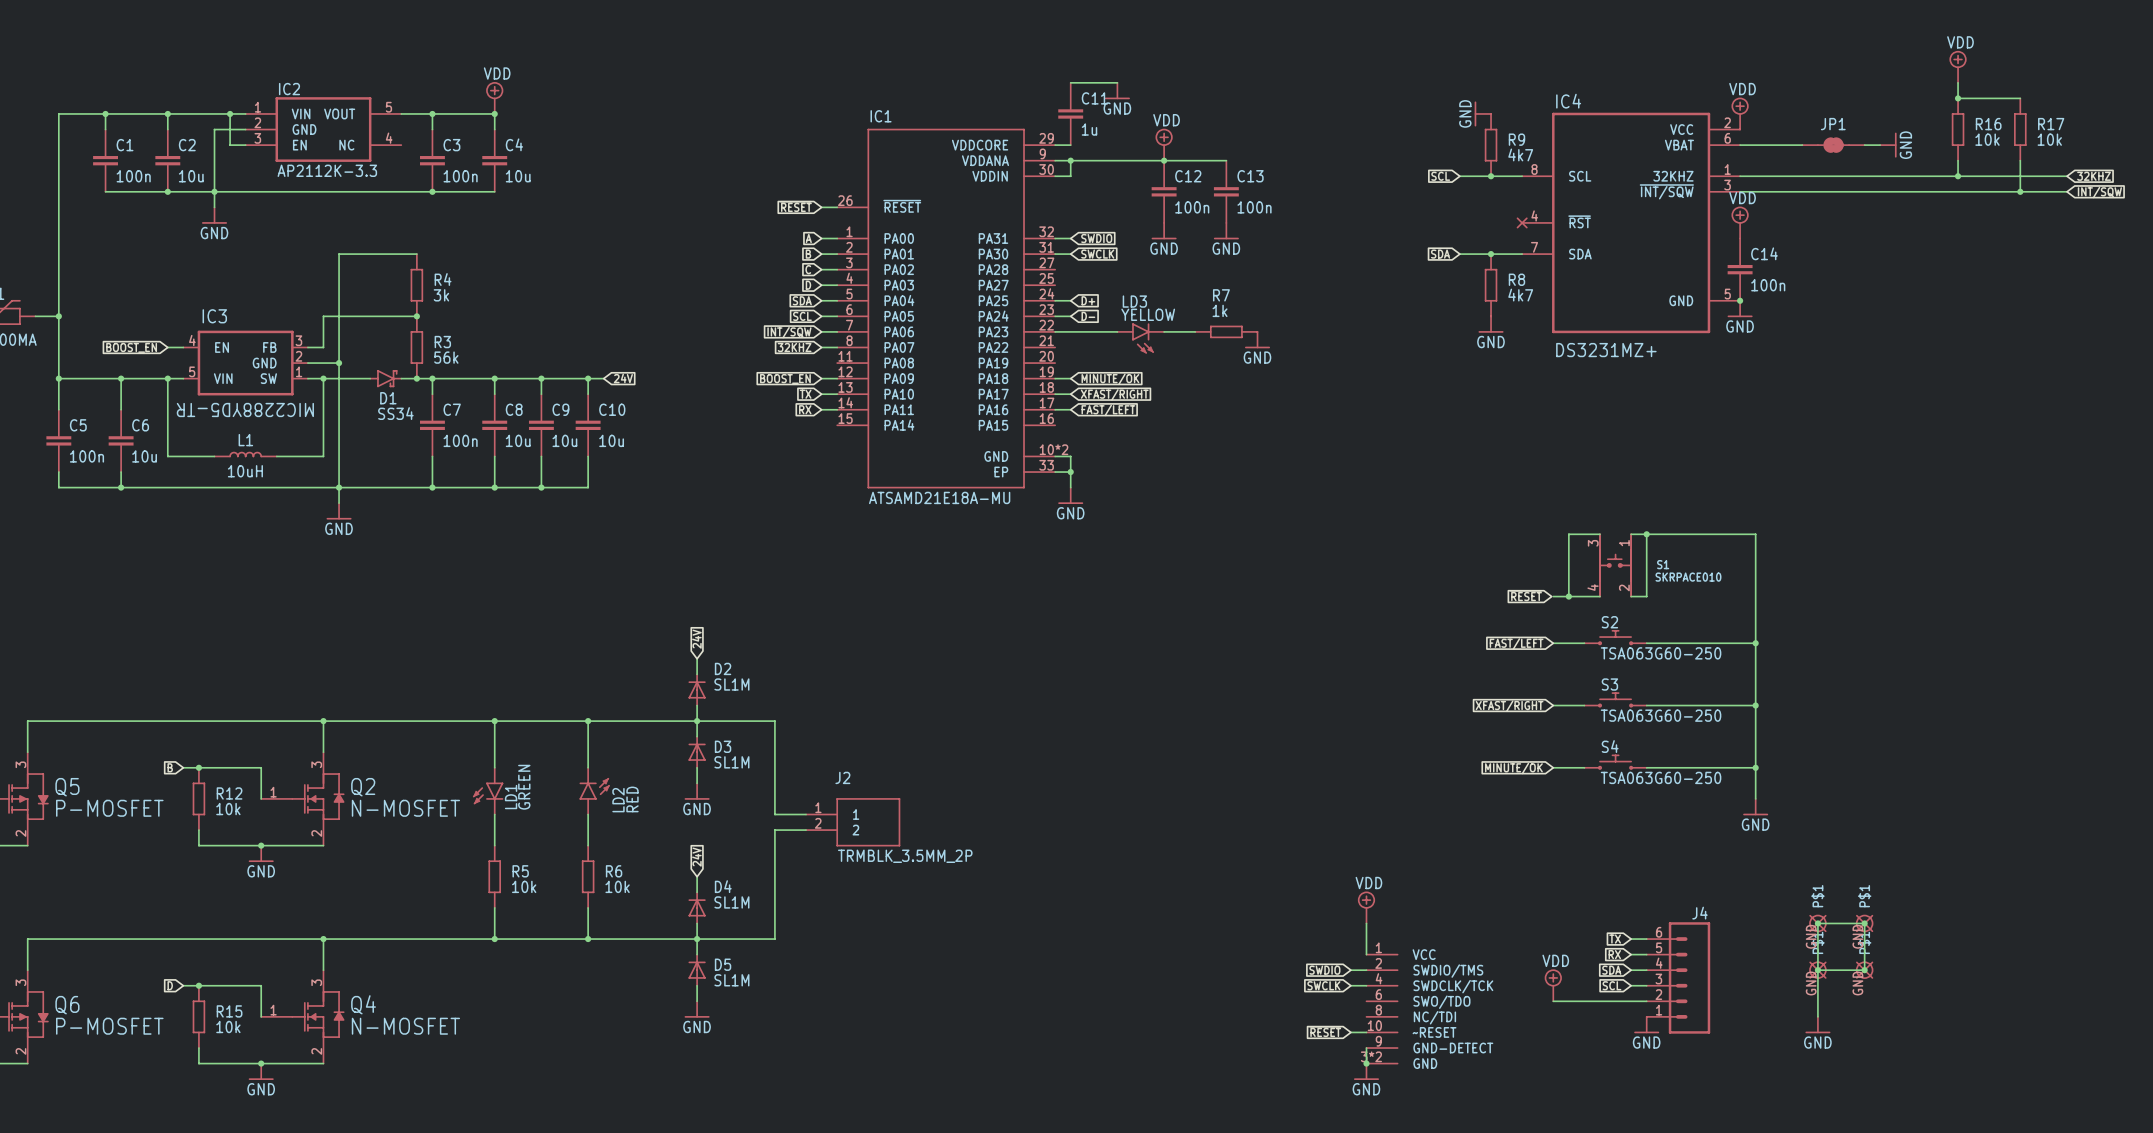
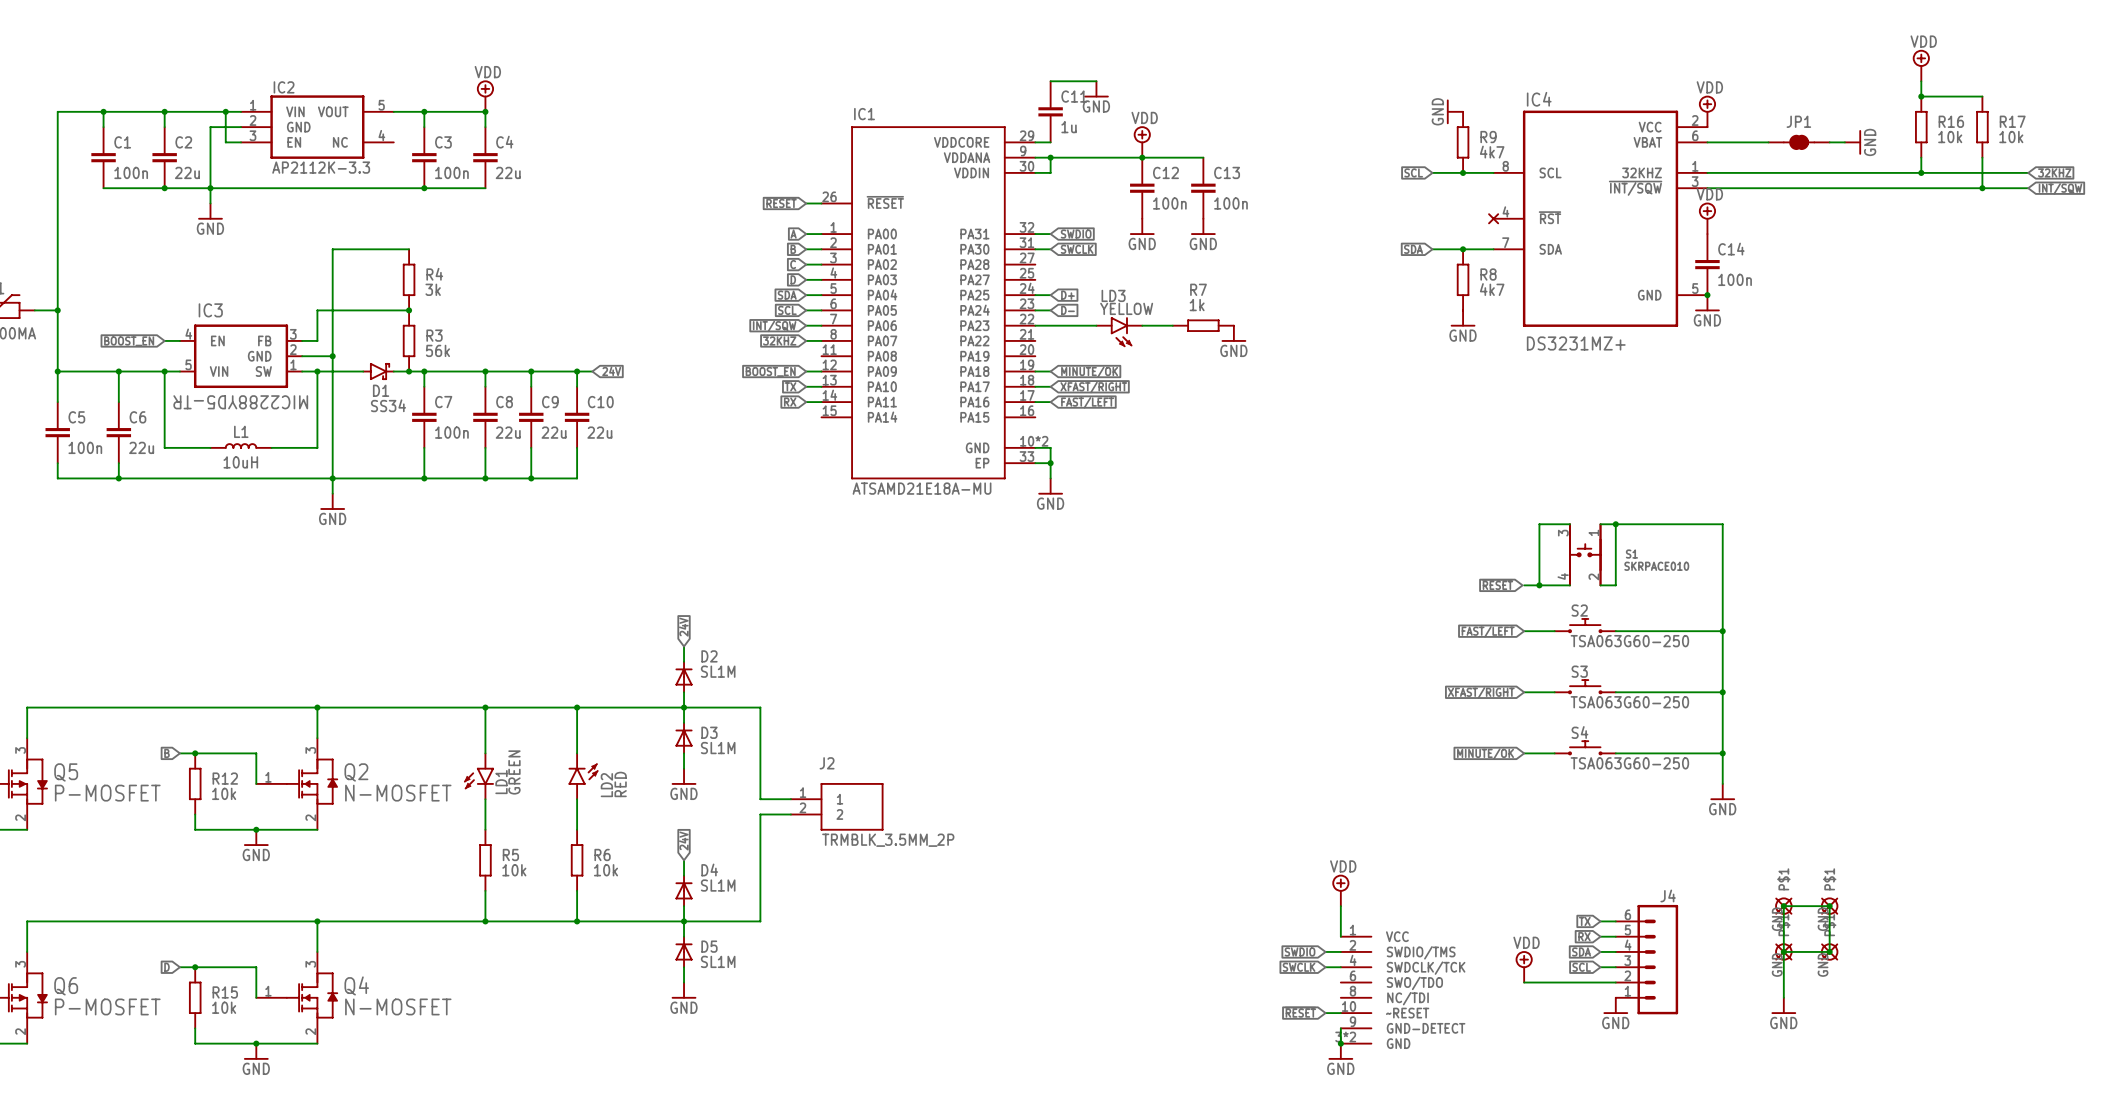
C2 value: 10u (191, 176) -> 22u (187, 172)
C4 value: 10u (518, 176) -> 22u (508, 172)
C8 value: 10u (518, 440) -> 22u (508, 432)
C9 value: 10u (564, 440) -> 22u (554, 432)
C10 value: 10u (611, 440) -> 22u (599, 432)
C6 value: 10u (144, 456) -> 22u (141, 447)

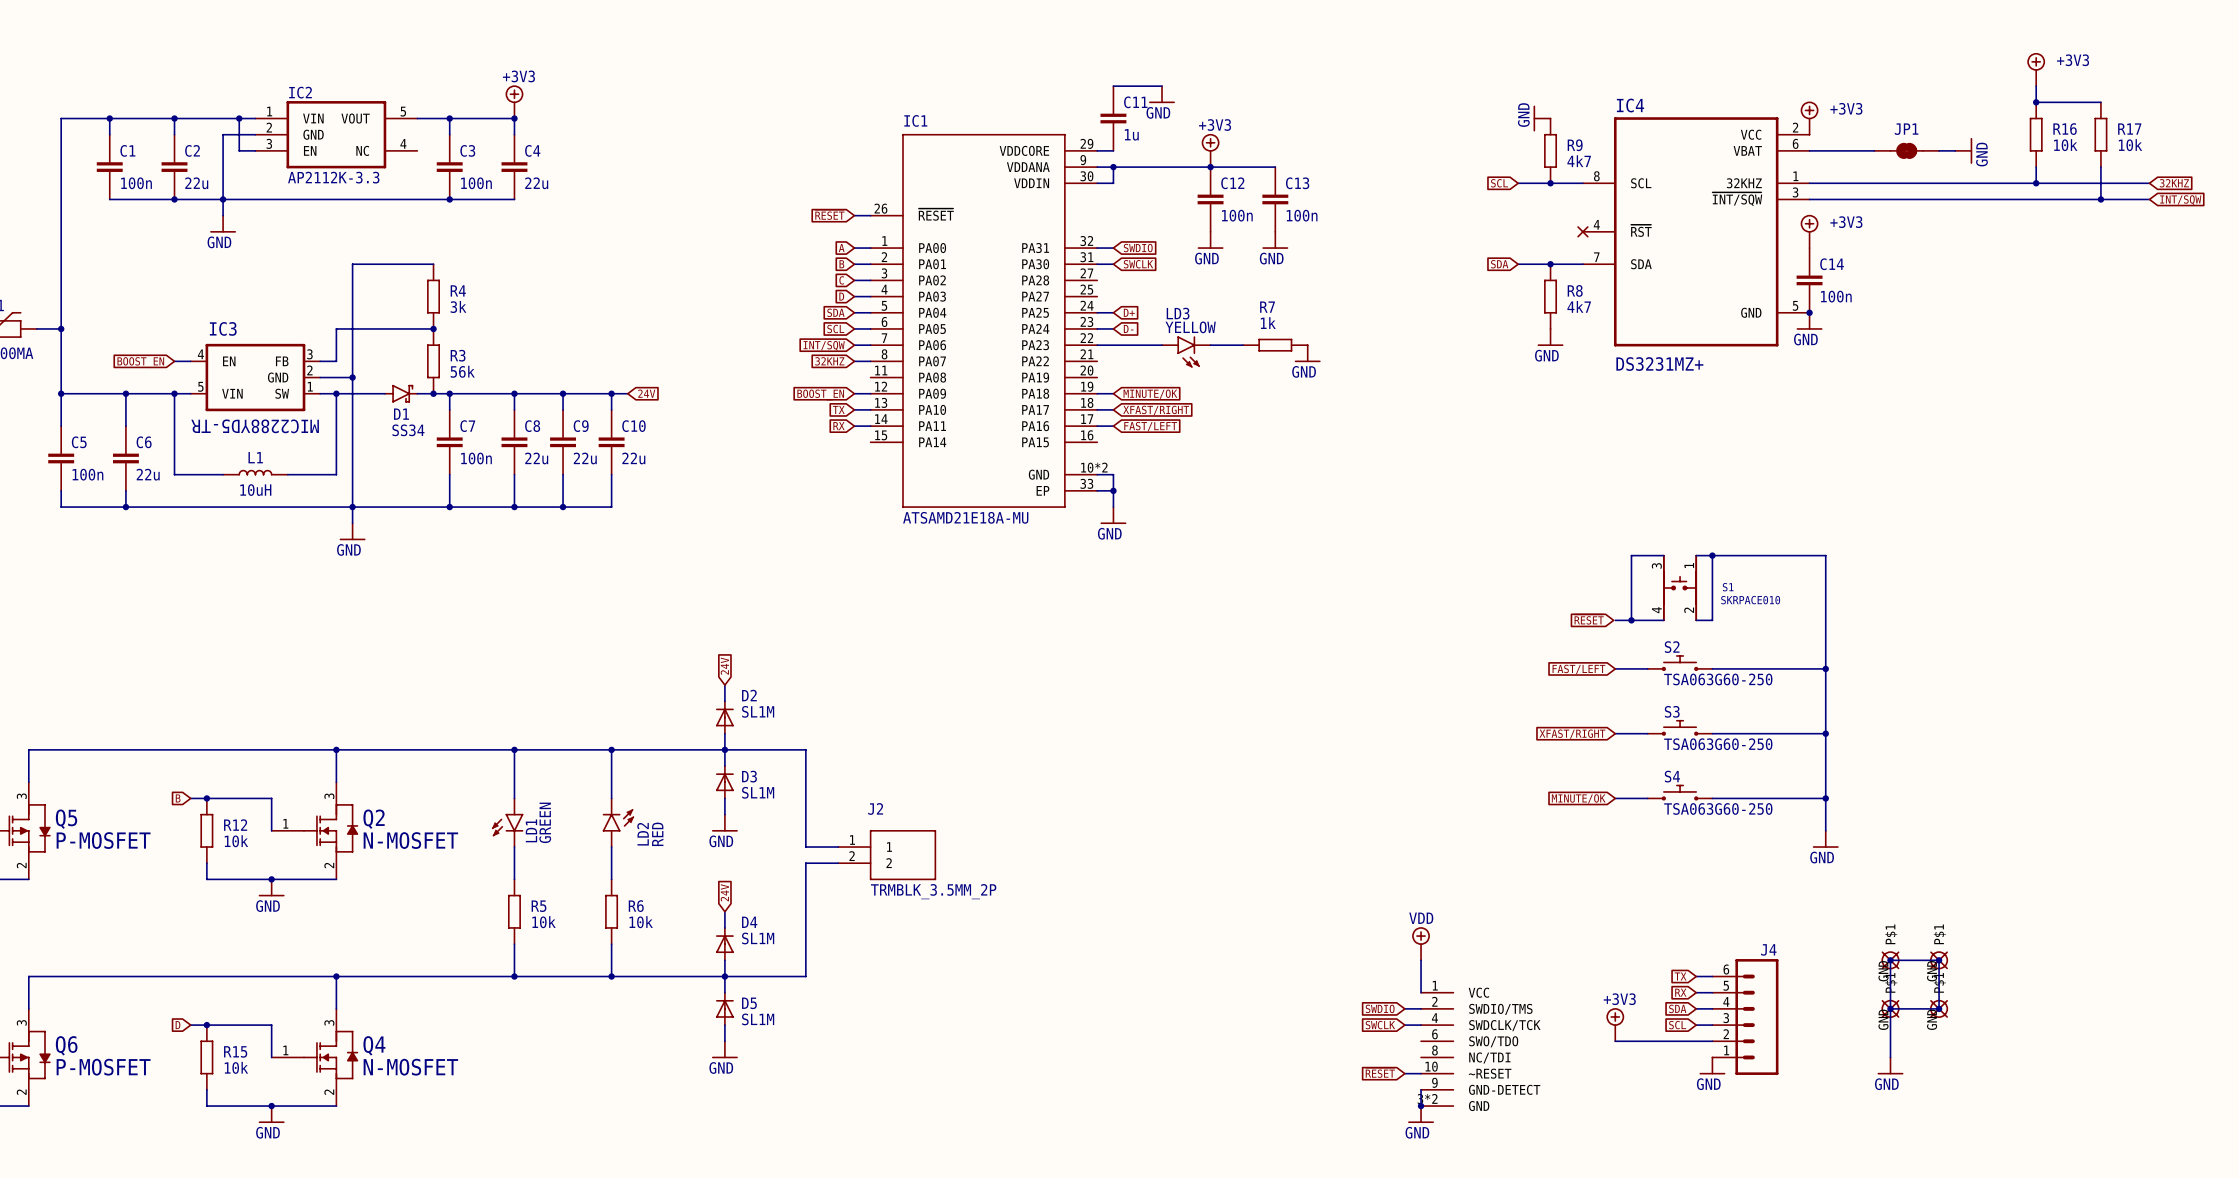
power symbol: VDD (1921, 65) -> +3V3 (2036, 69)
power symbol: VDD (485, 96) -> +3V3 (514, 101)
power symbol: VDD (1707, 111) -> +3V3 (1809, 118)
power symbol: VDD (1142, 142) -> +3V3 (1210, 150)
power symbol: VDD (1707, 218) -> +3V3 (1809, 231)
power symbol: VDD (1524, 966) -> +3V3 (1615, 1024)

